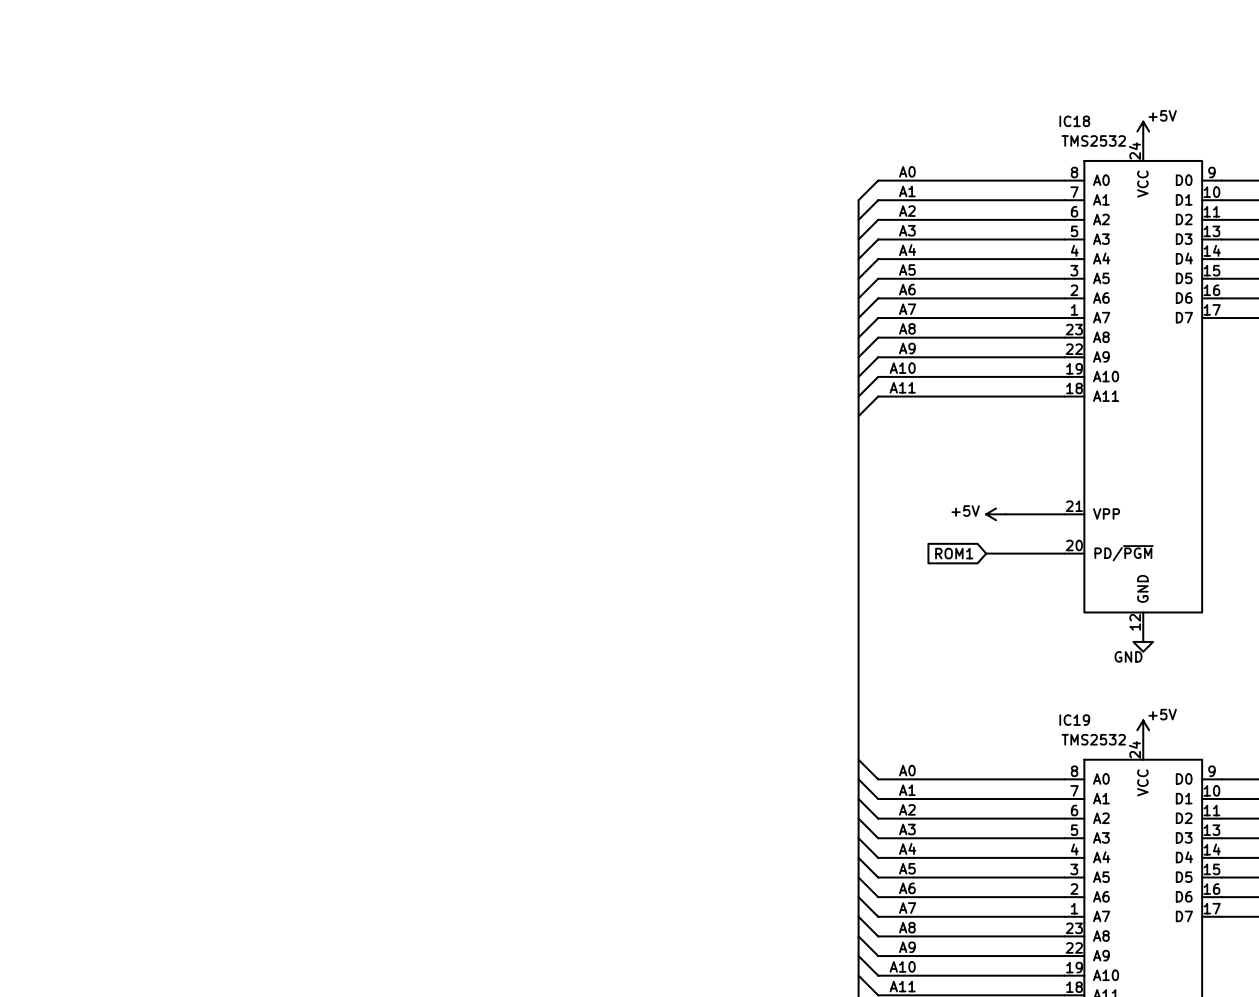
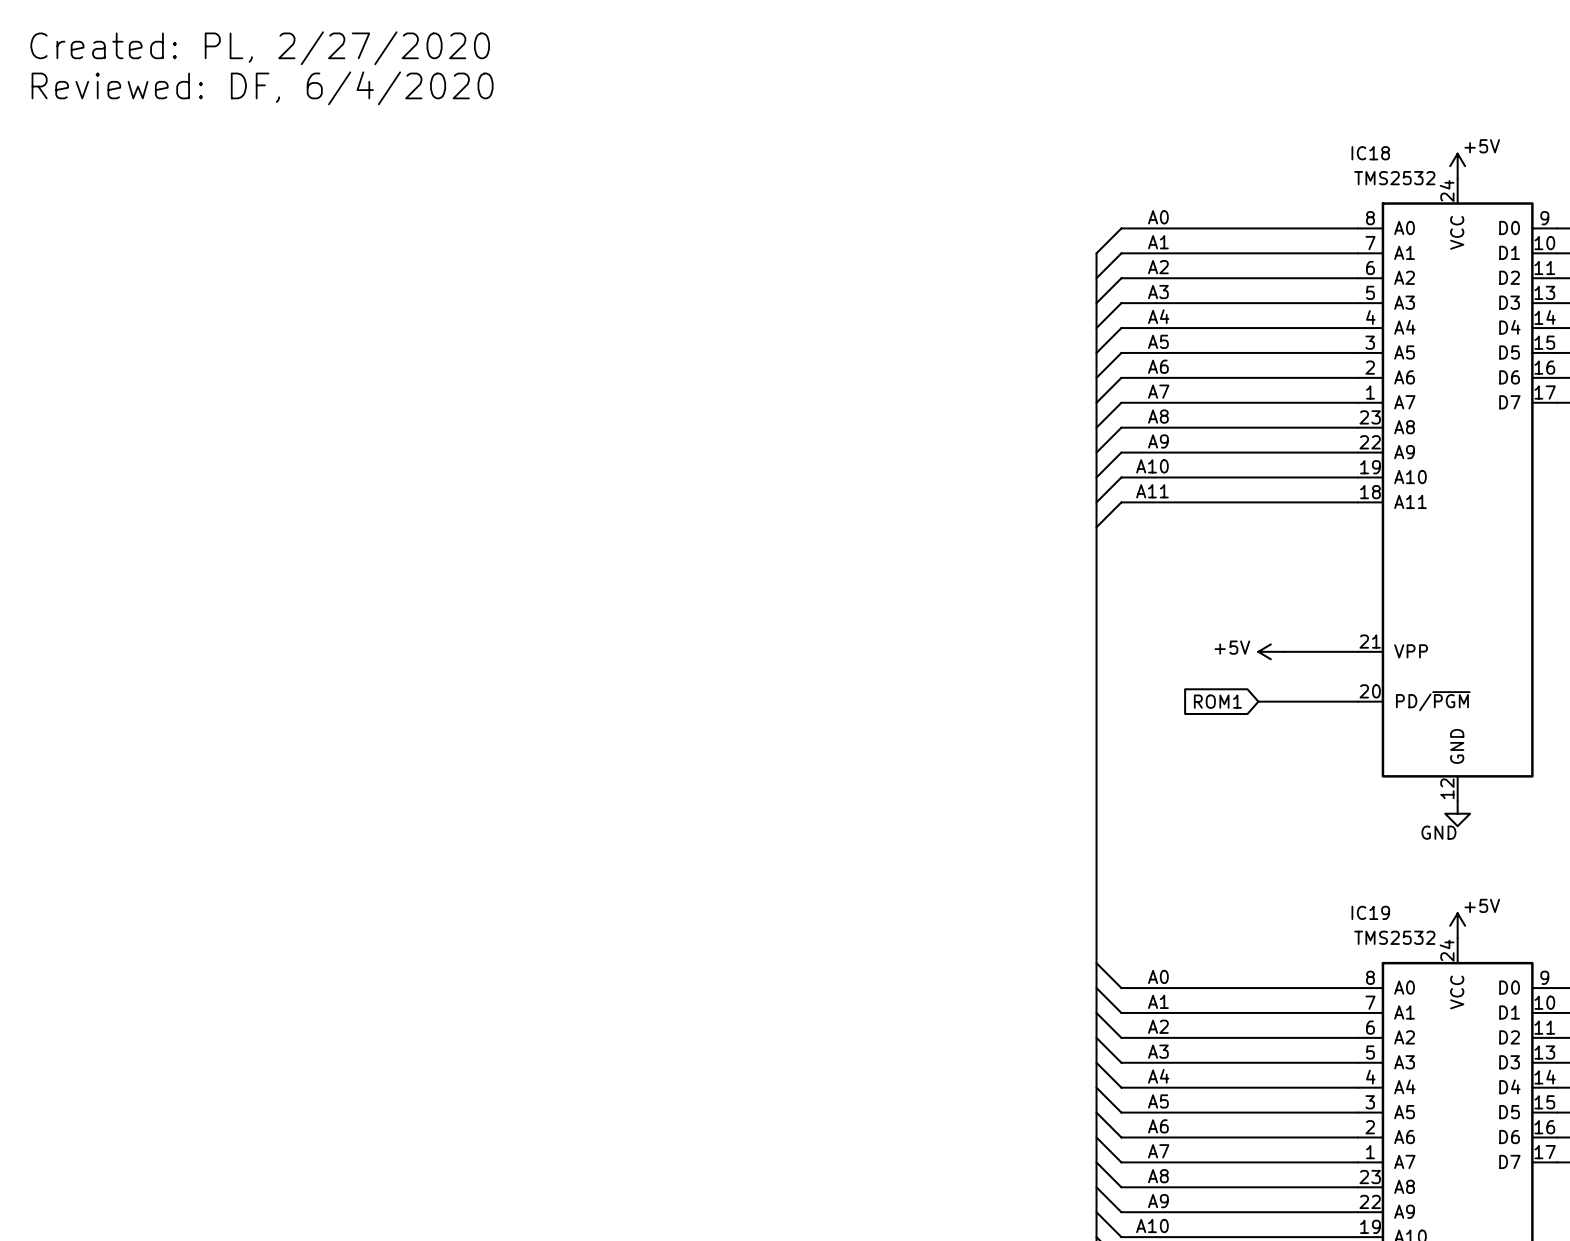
text: none -> Created: PL, 2/27/2020 (260, 48)
text: none -> Reviewed: DF, 6/4/2020 (262, 88)

